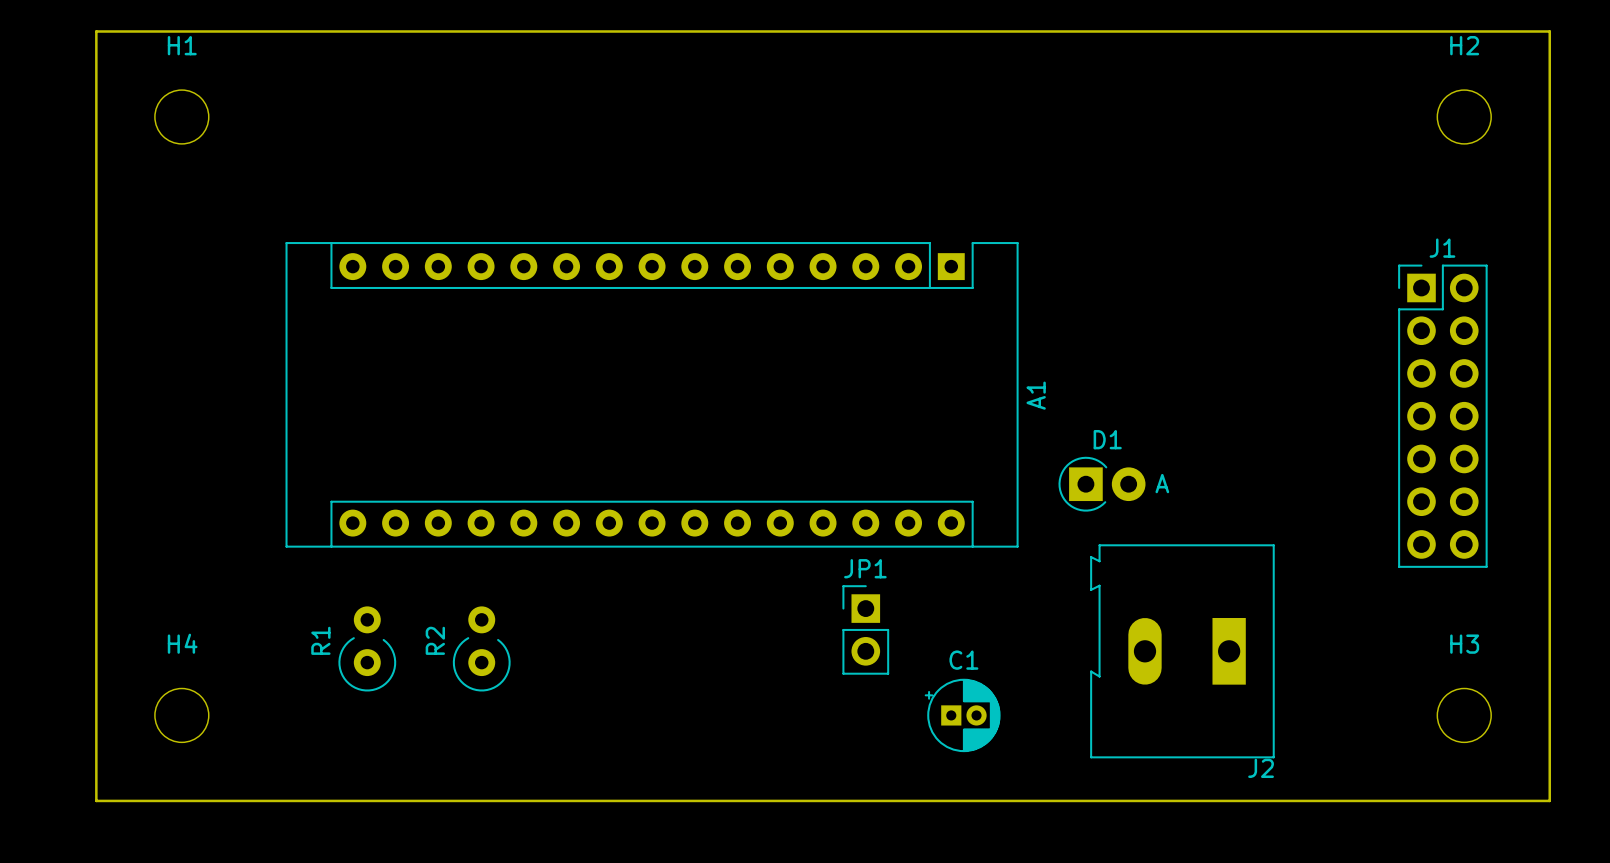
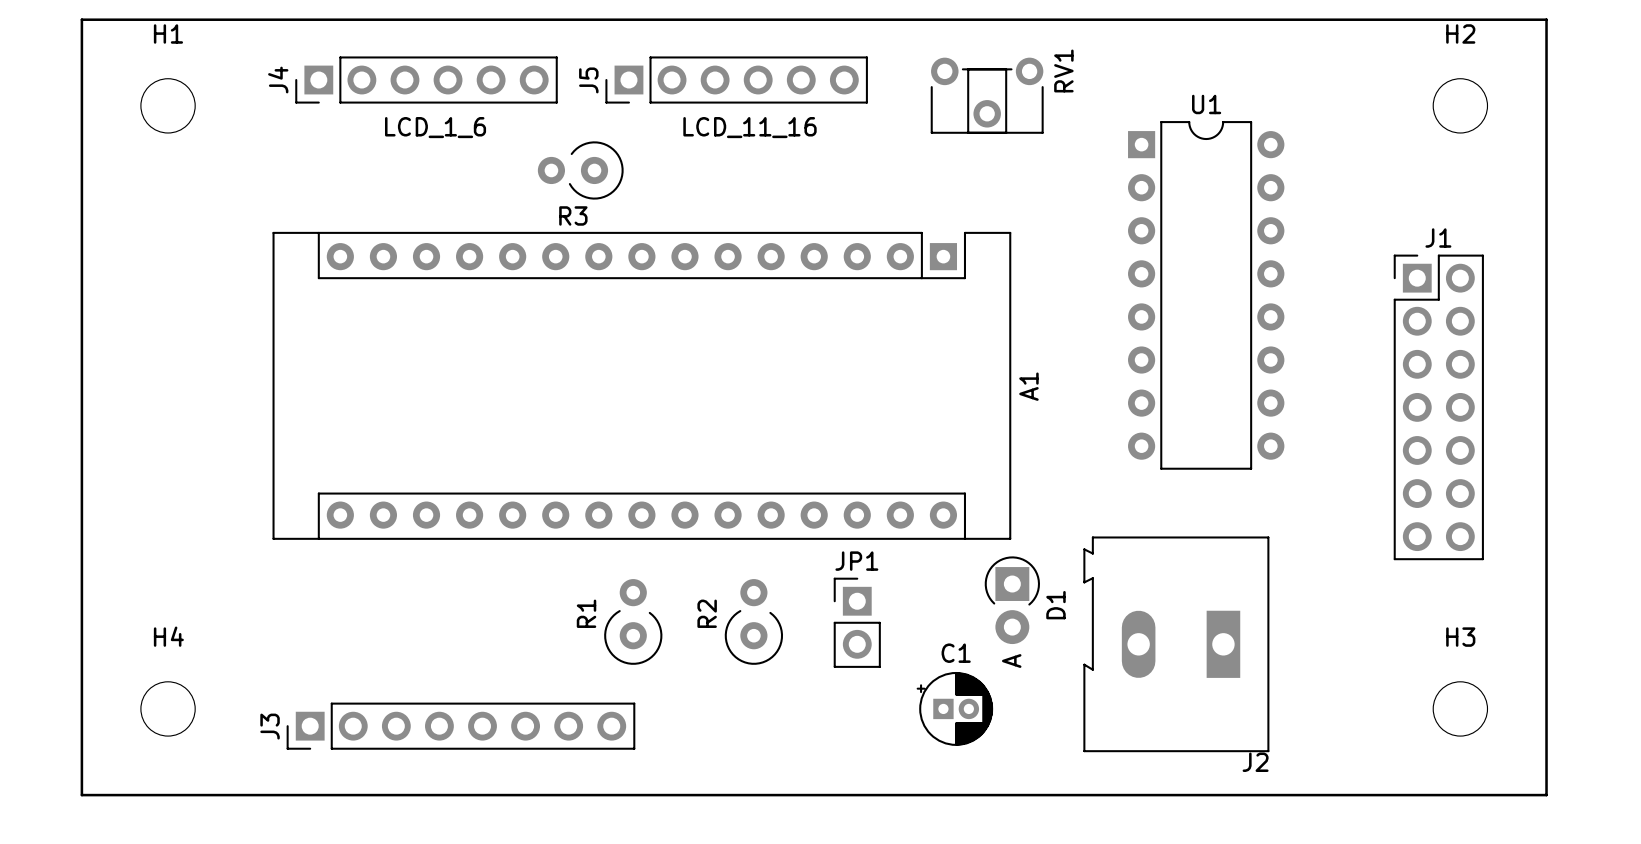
J4: none -> LCD_1_6 (426, 80)
J5: none -> LCD_11_16 (736, 80)
RV1: none -> (987, 95)
R3: none -> (580, 170)
U1: none -> (1206, 295)
D1 rotation: 0° (1101, 484) -> 90° clockwise (1012, 600)
D1 position: (1101, 484) -> (1012, 600)
R1 position: (367, 648) -> (633, 621)
R2 position: (481, 648) -> (753, 621)
J3: none -> (460, 726)

